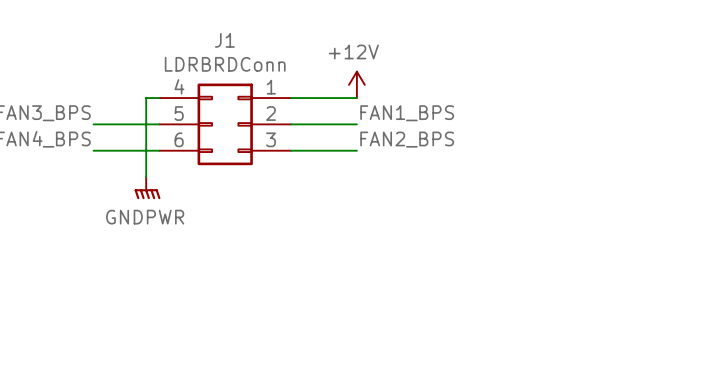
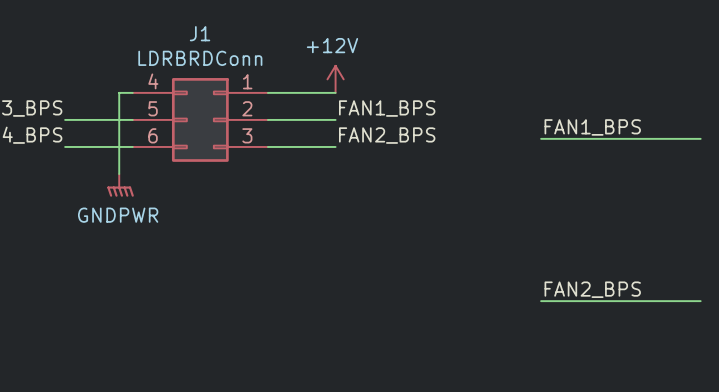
label: none -> FAN1_BPS (592, 127)
wire: none -> (541, 138) (700, 138)
label: none -> FAN2_BPS (592, 289)
wire: none -> (541, 301) (700, 301)

